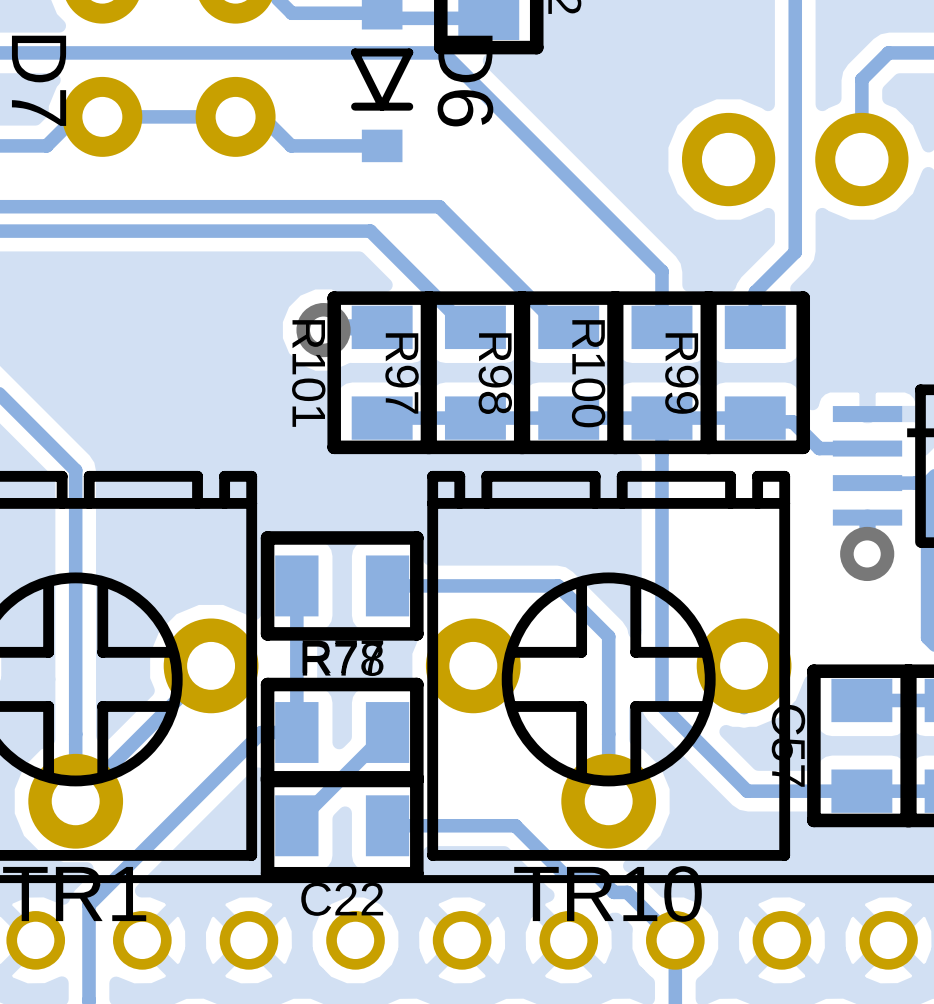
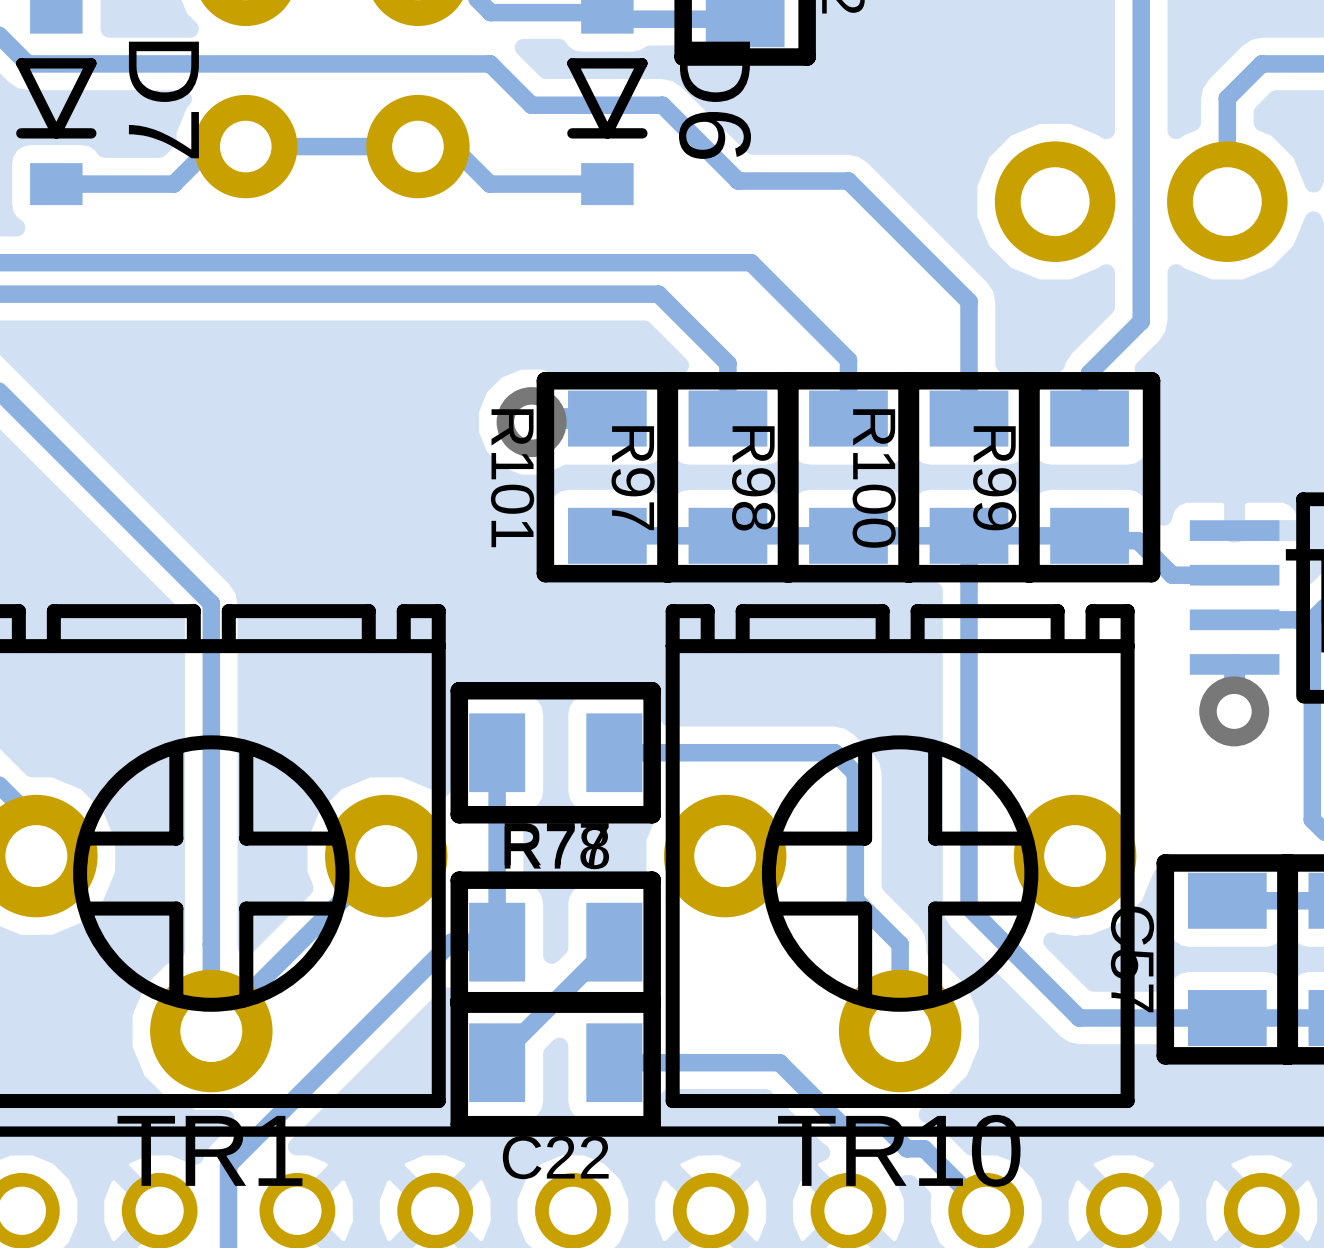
track: (291, 52) (443, 52) (661, 271) -> (490, 63) (531, 105) (662, 105) (738, 181) (848, 181) (969, 301) (969, 346)
track: (439, 206) (559, 327) (568, 327) -> (681, 262) (751, 262) (848, 360) (848, 418)
track: (370, 231) (466, 327) (475, 327) -> (592, 294) (658, 294) (727, 363) (727, 418)
track: (574, 601) (608, 636) (608, 734) -> (855, 773) (855, 899) (900, 944)

